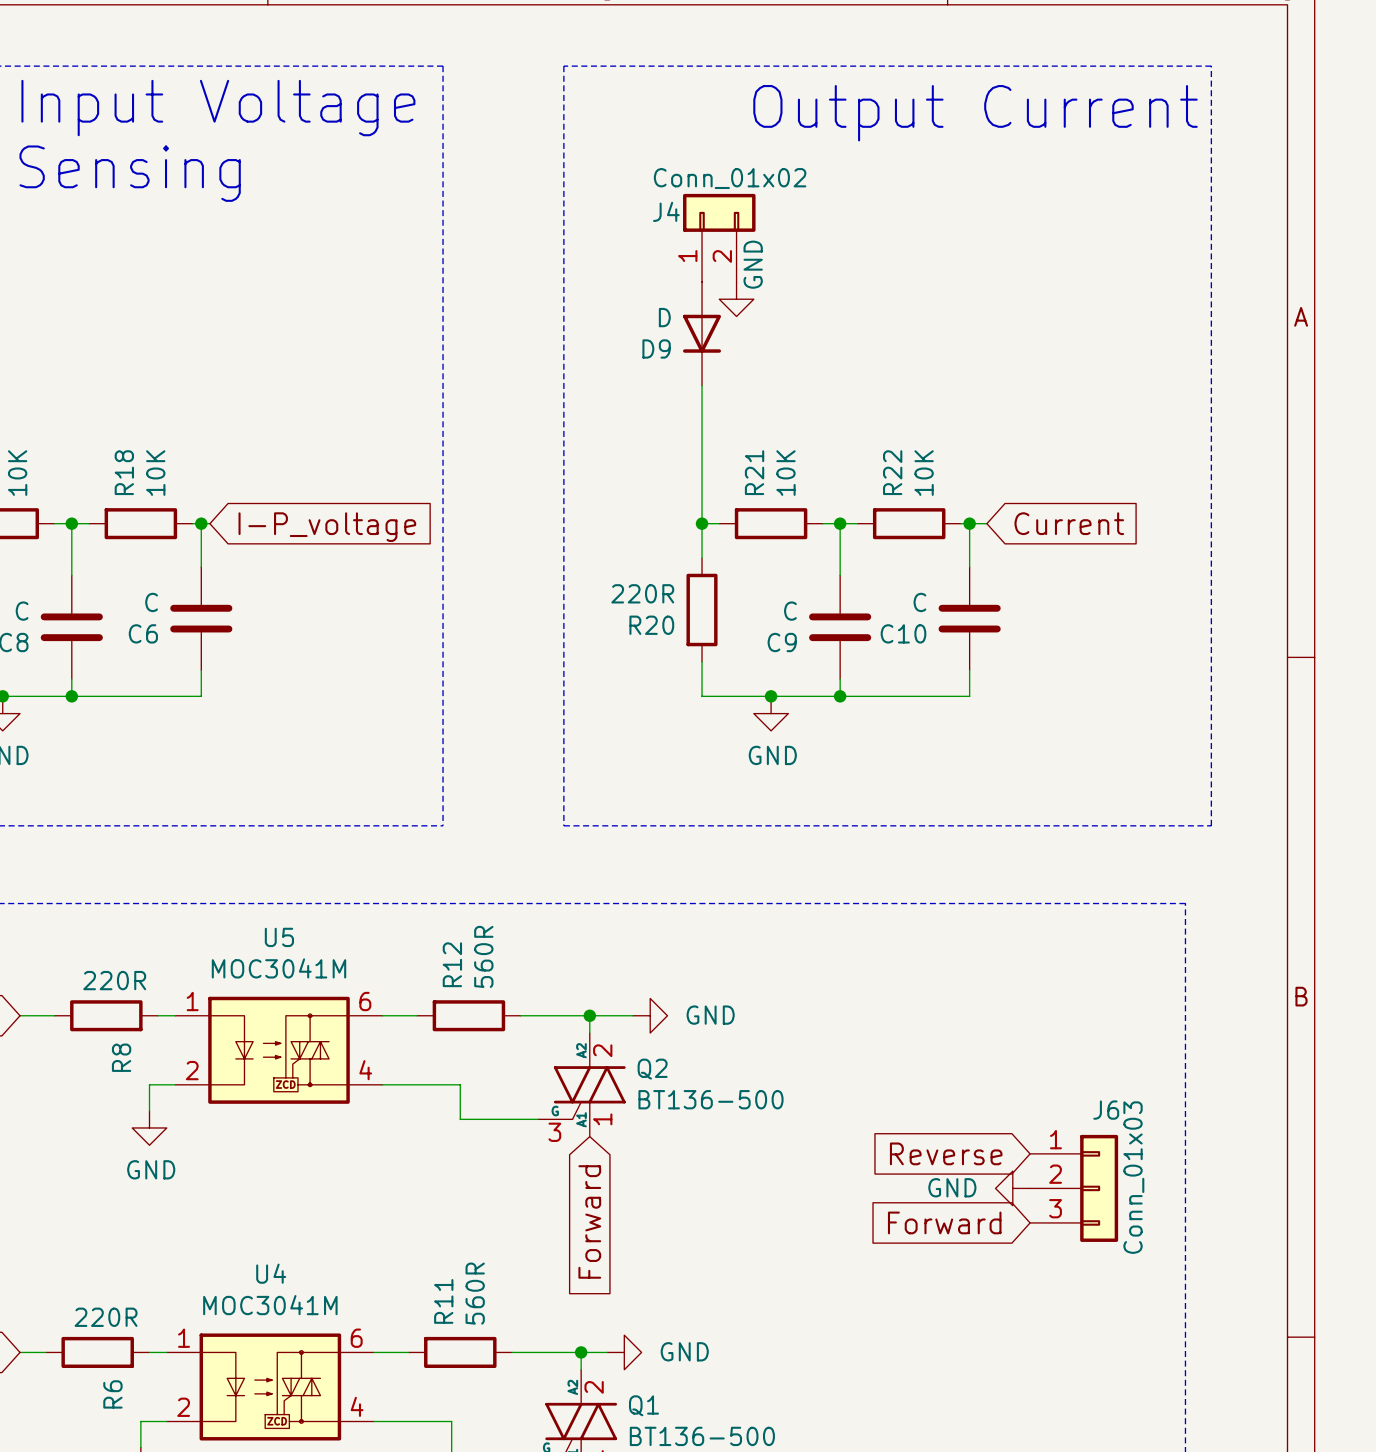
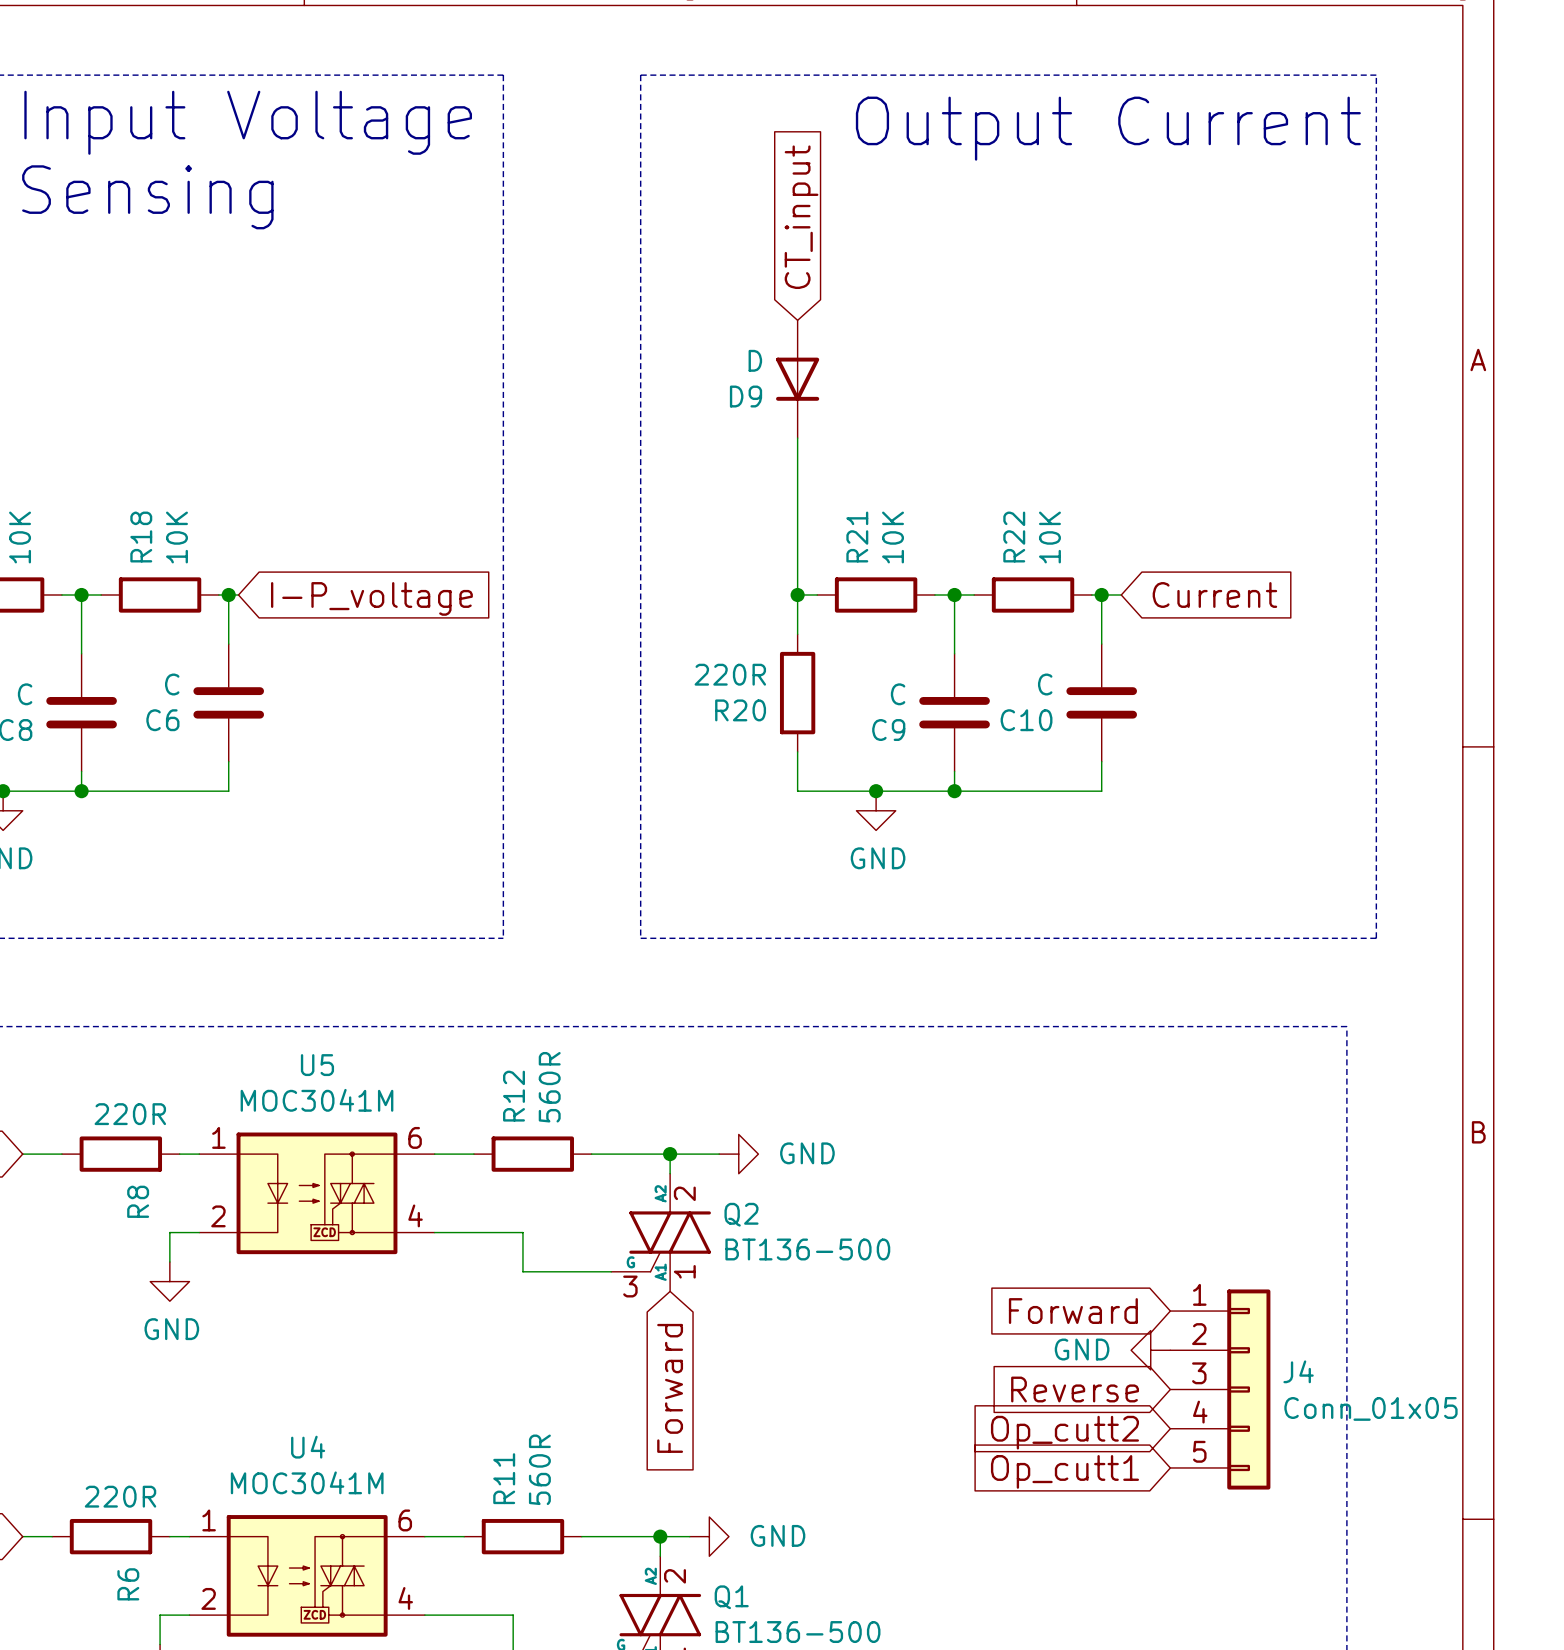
J4 value: Conn_01x02 (730, 178) -> Conn_01x05 (1370, 1408)
global label: none -> CT_input (801, 217)
J4 symbol: [683, 193, 756, 282] -> [1170, 1289, 1271, 1490]
J4 name position: J4 (666, 211) -> J4 (1298, 1371)
power symbol: GND (736, 299) -> none
global label: Reverse (946, 1153) -> Forward (1073, 1311)
J6: Conn_01x03 (1074, 1188) -> none
global label: Forward (944, 1222) -> Reverse (1075, 1389)
global label: none -> Op_cutt2 (1064, 1432)
global label: none -> Op_cutt1 (1064, 1471)

